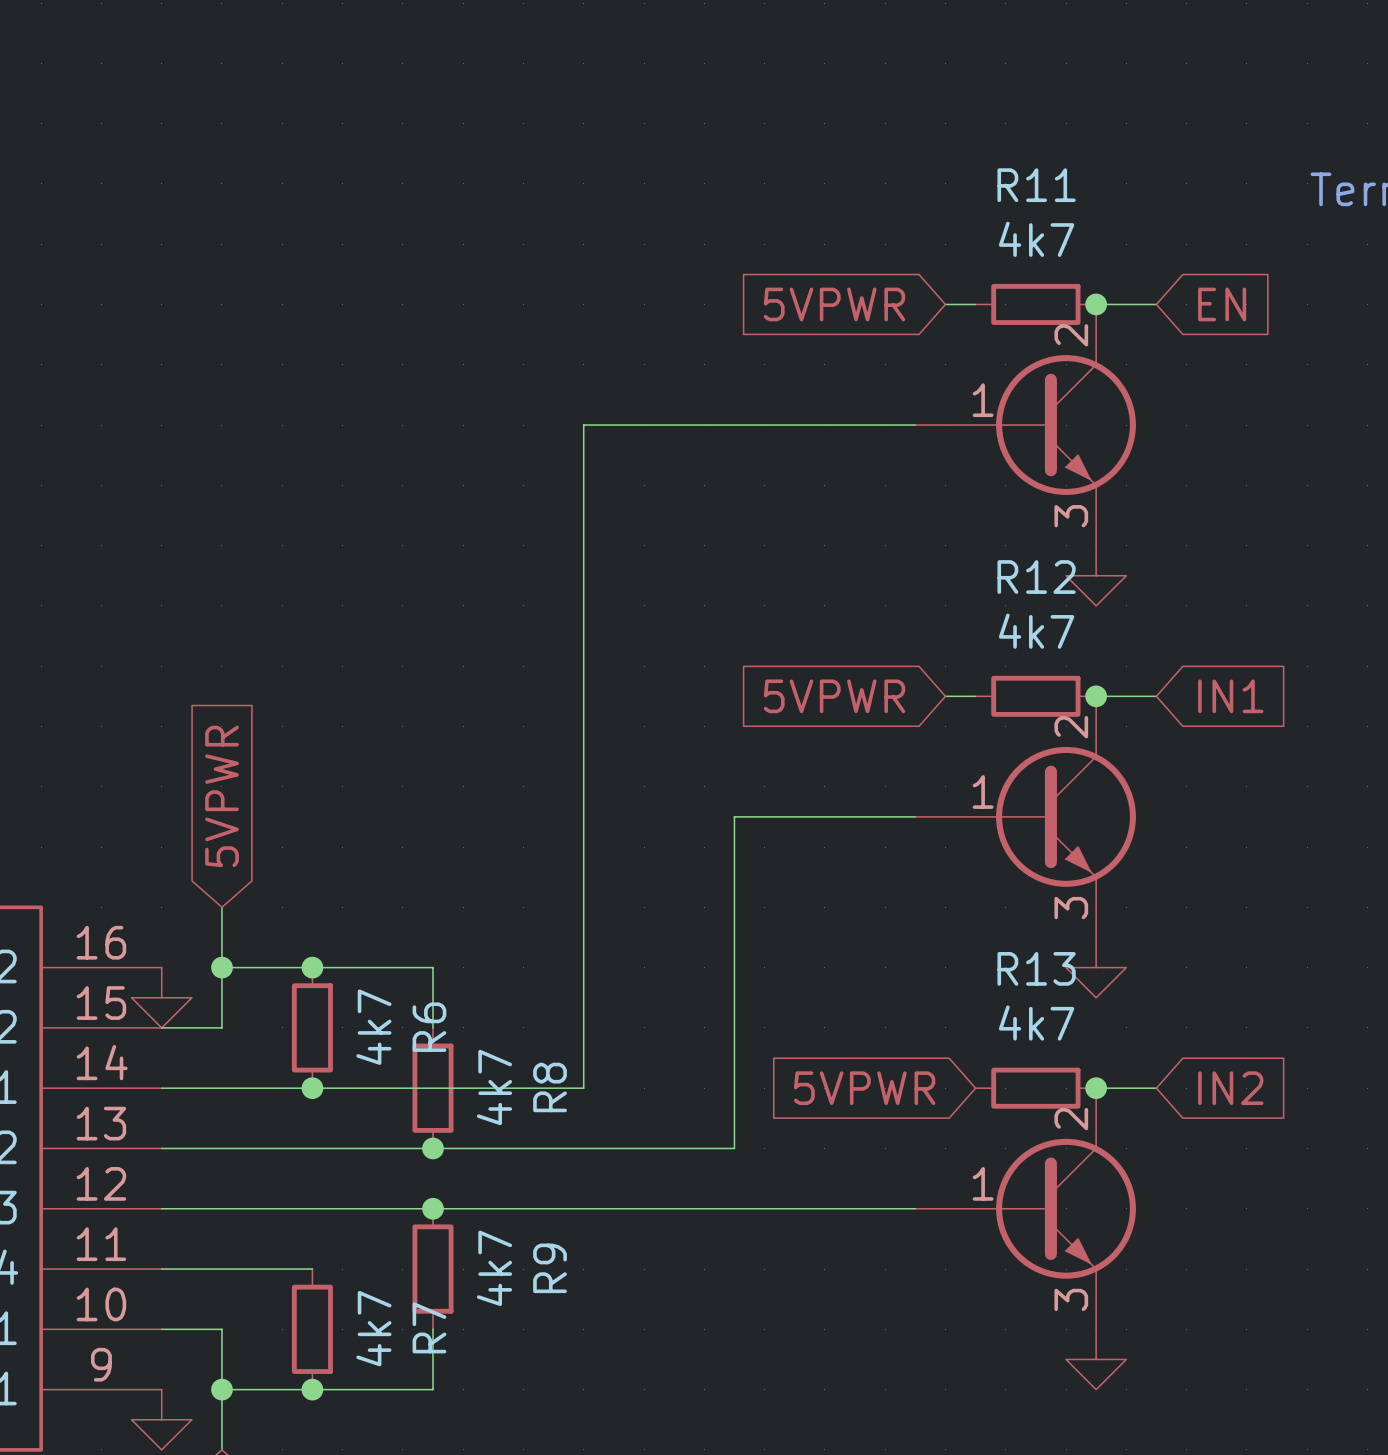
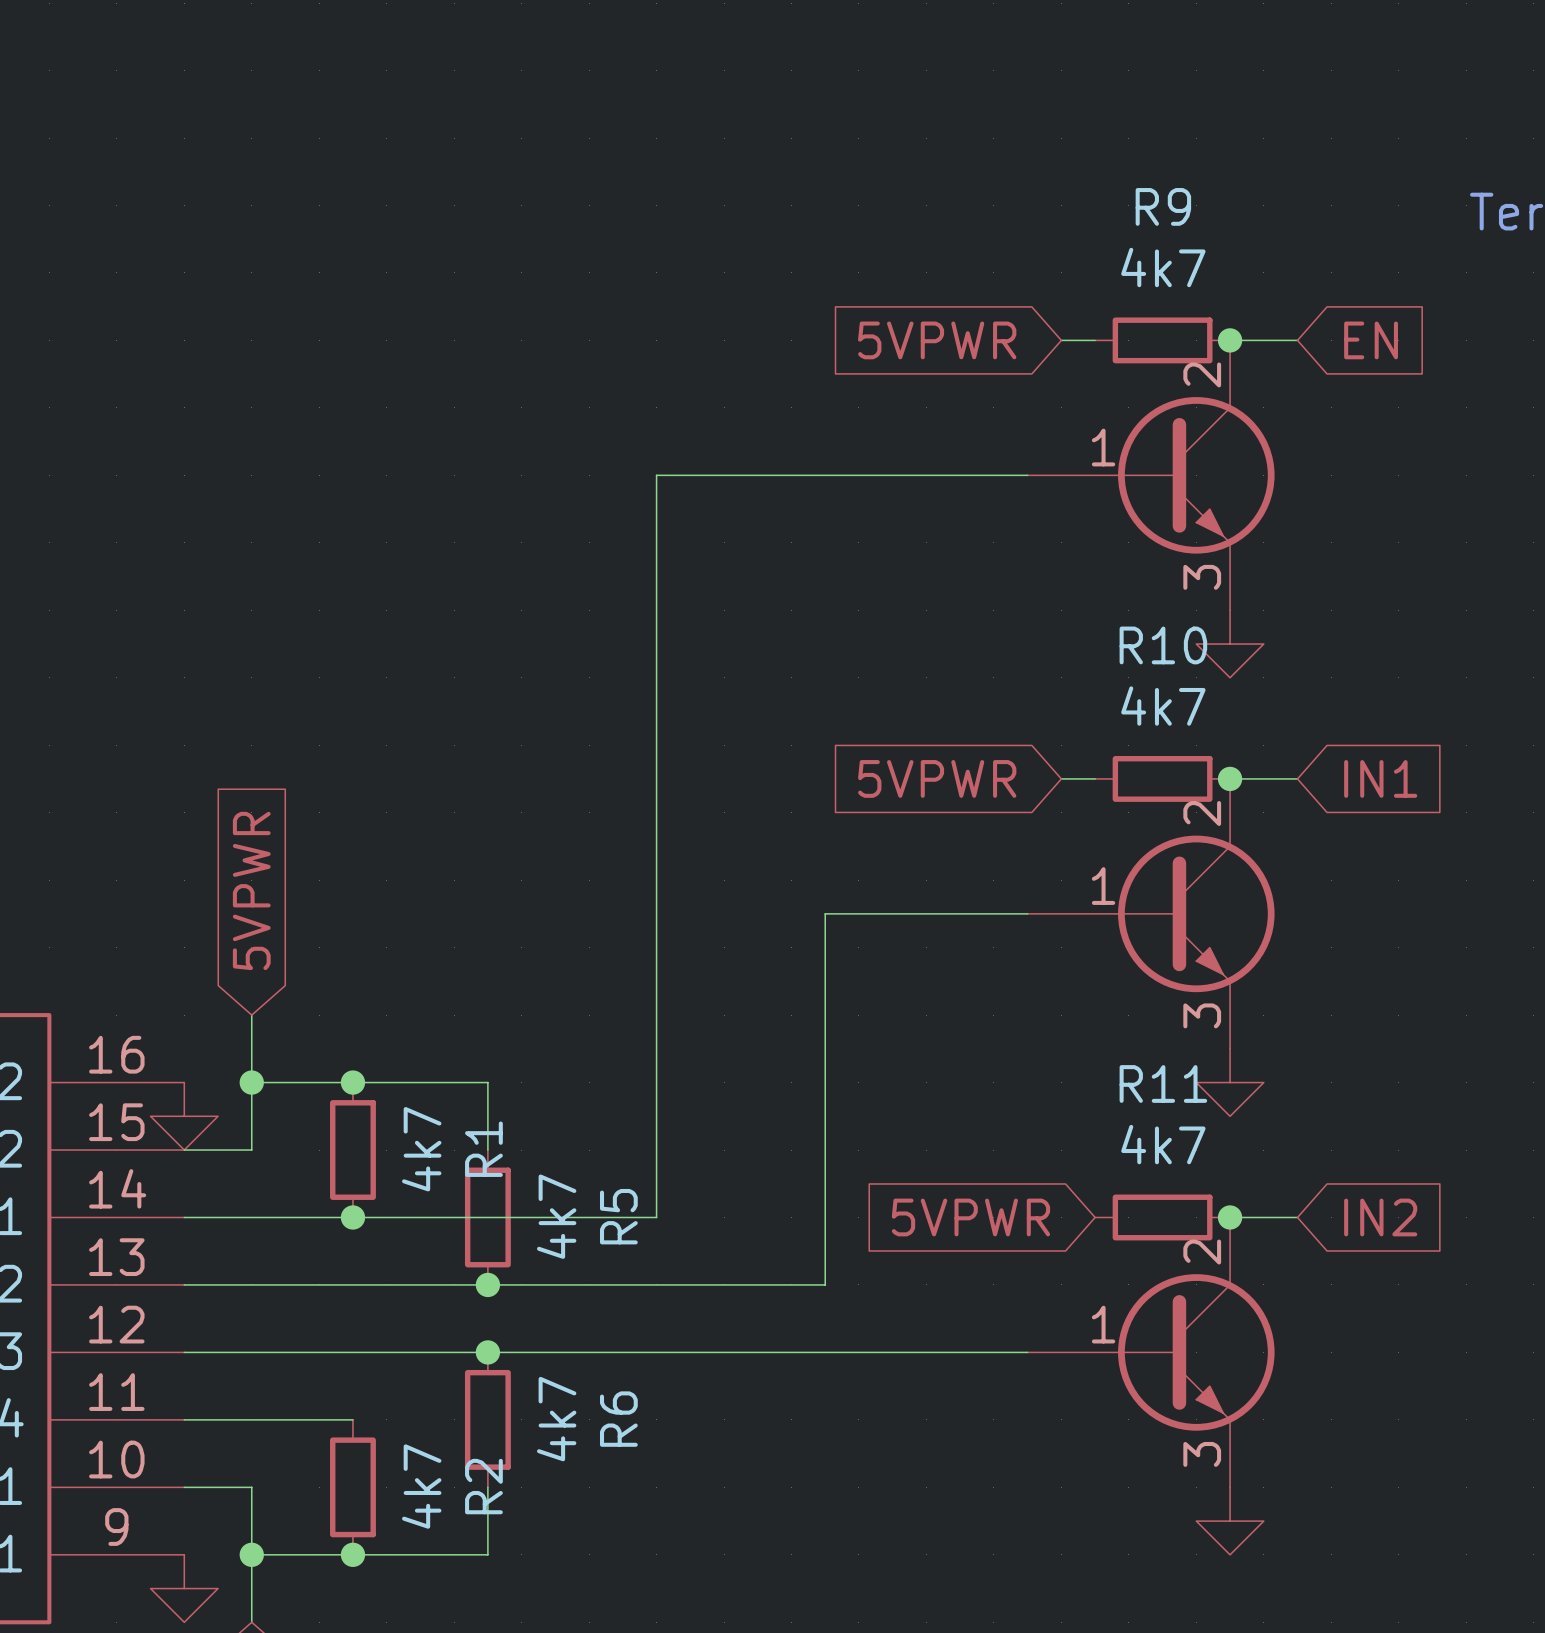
R11 name: R11 (1036, 185) -> R9 (1163, 206)
R12 name: R12 (1036, 577) -> R10 (1163, 645)
R13 name: R13 (1036, 968) -> R11 (1163, 1083)
R6 name: R6 (429, 1027) -> R1 (483, 1149)
R8 name: R8 (550, 1087) -> R5 (618, 1216)
R9 name: R9 (550, 1268) -> R6 (618, 1419)
R7 name: R7 (429, 1327) -> R2 (483, 1486)

